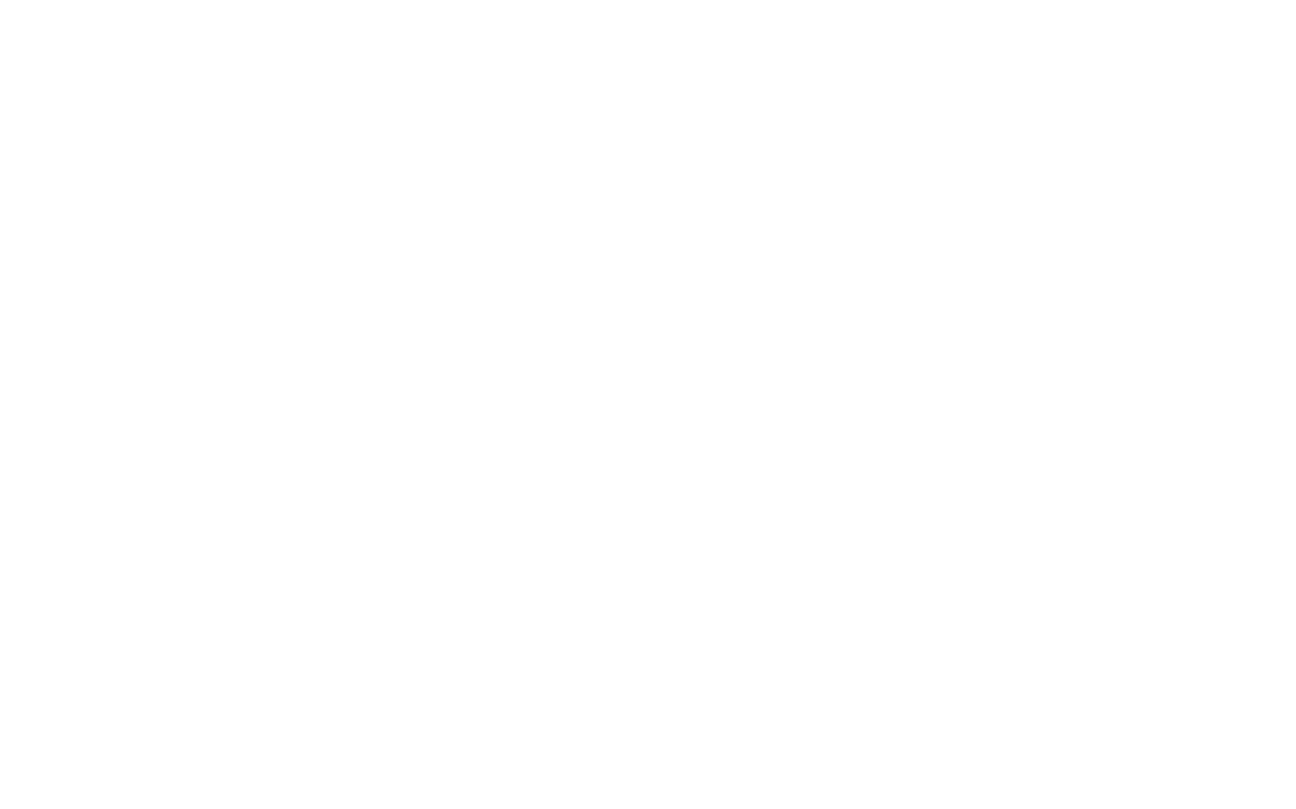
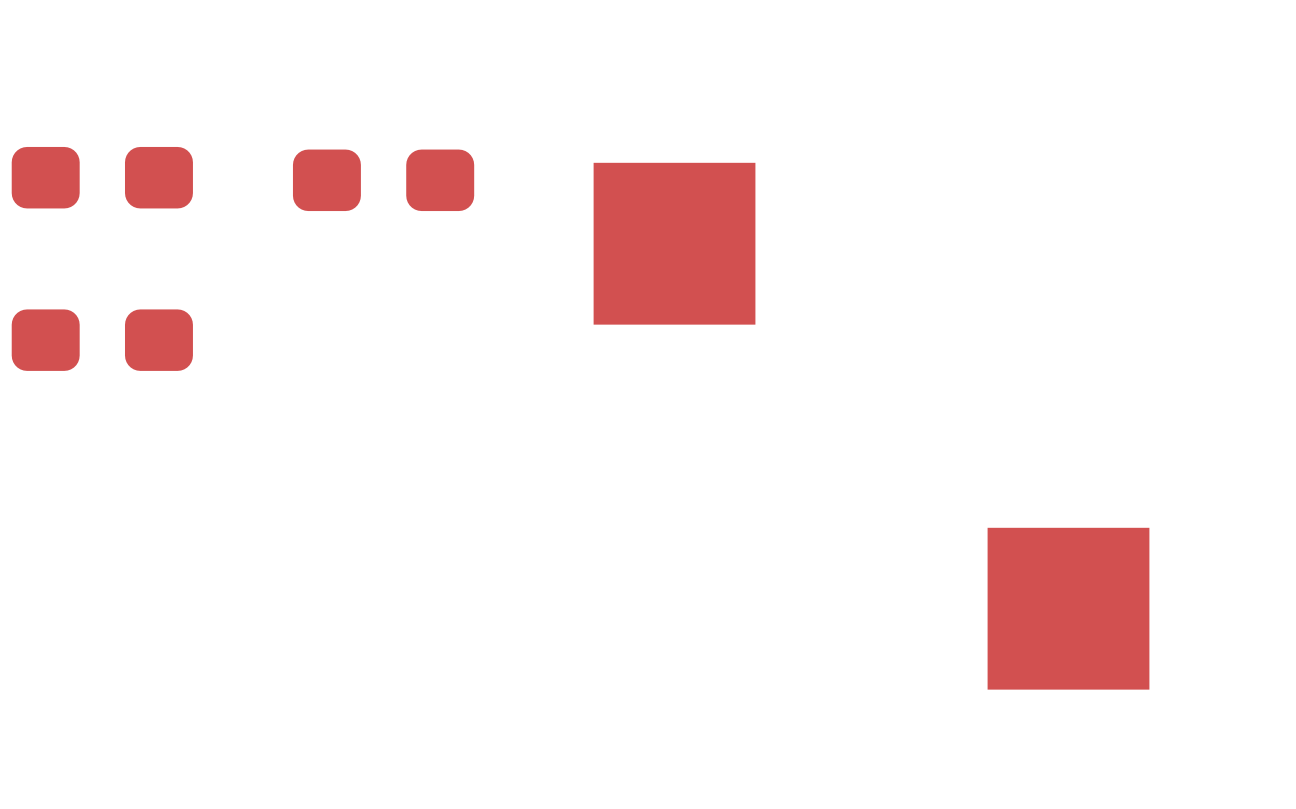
part: none -> (102, 177)
part: none -> (383, 180)
part: none -> (674, 243)
part: none -> (102, 340)
part: none -> (1068, 608)

